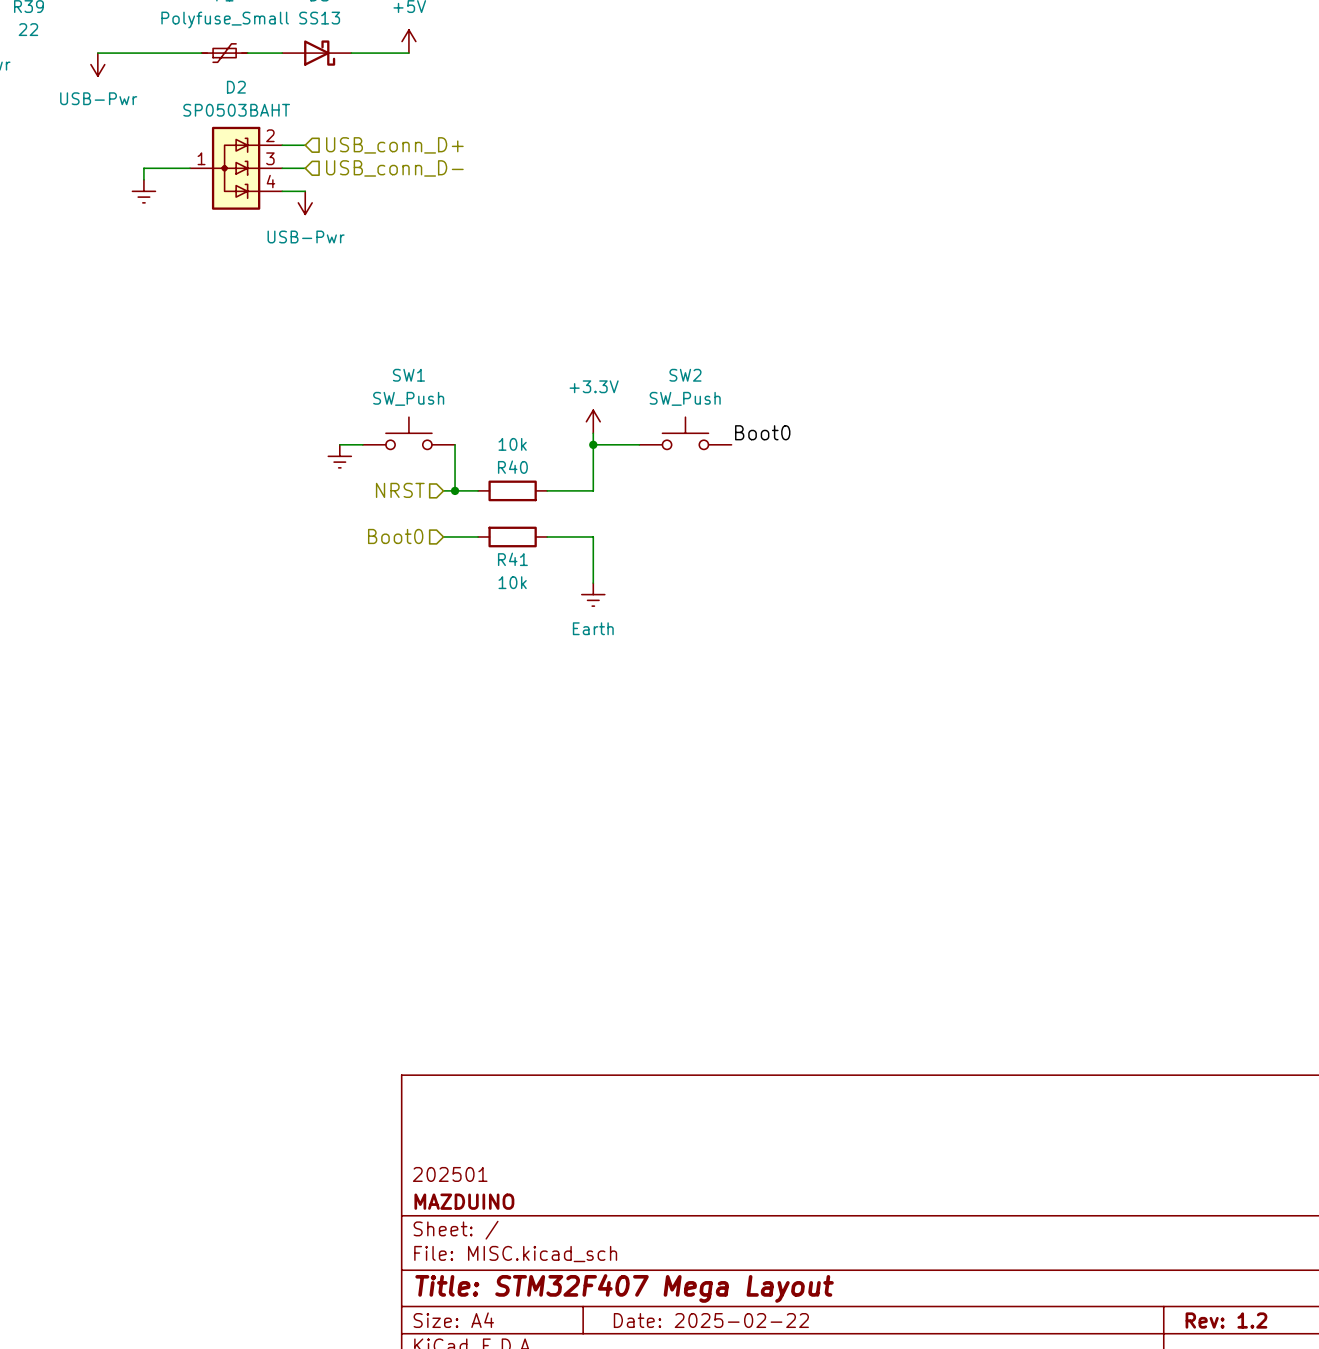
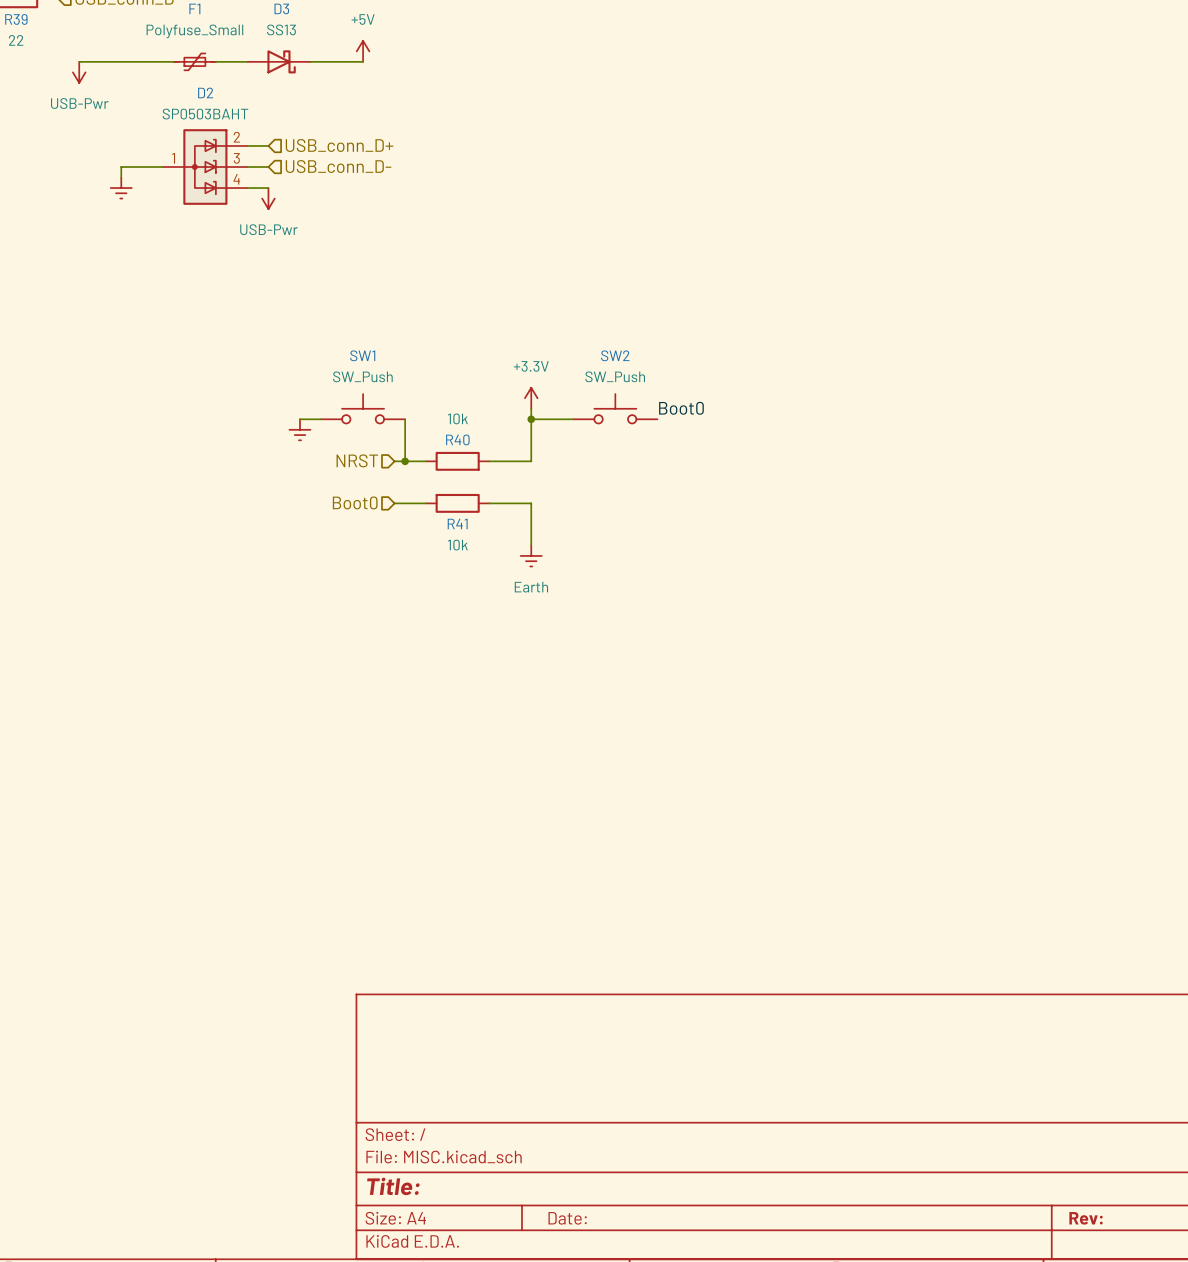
title block: 202501 (450, 1174) -> none
title block: MAZDUINO (464, 1201) -> none
title block: Title: STM32F407 Mega Layout (624, 1288) -> Title: (393, 1186)
title block: Date: 2025-02-22 (711, 1320) -> Date: (567, 1218)
title block: Rev: 1.2 (1226, 1320) -> Rev: (1086, 1218)

